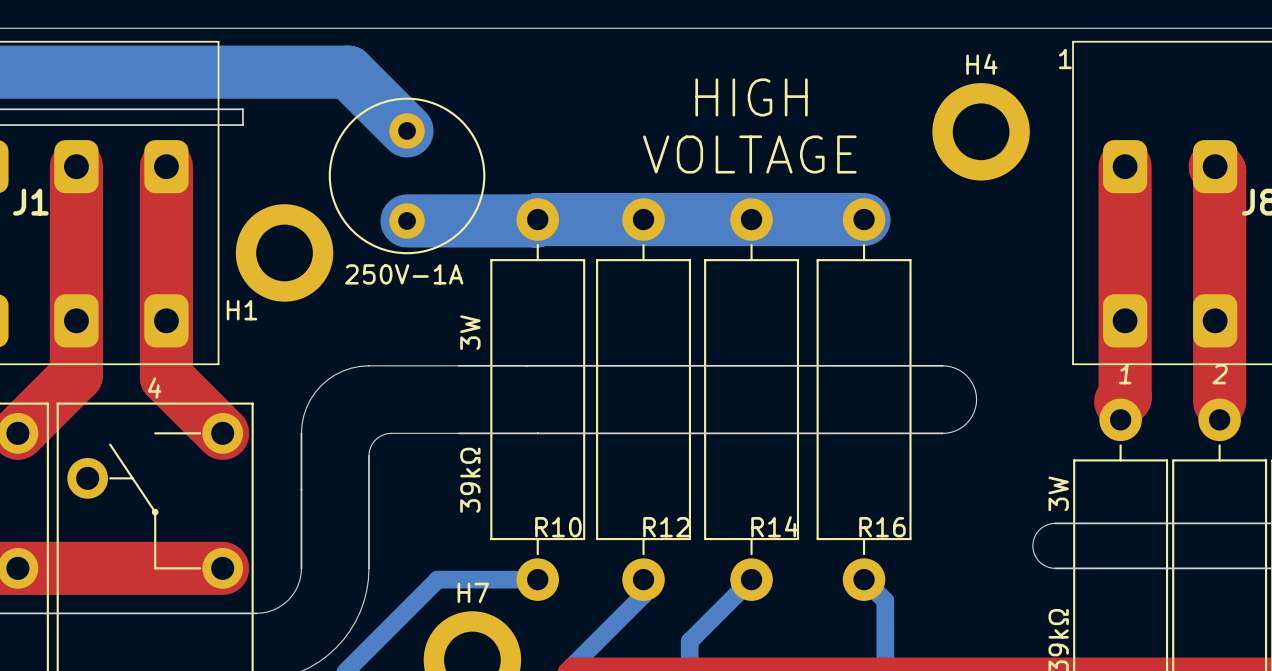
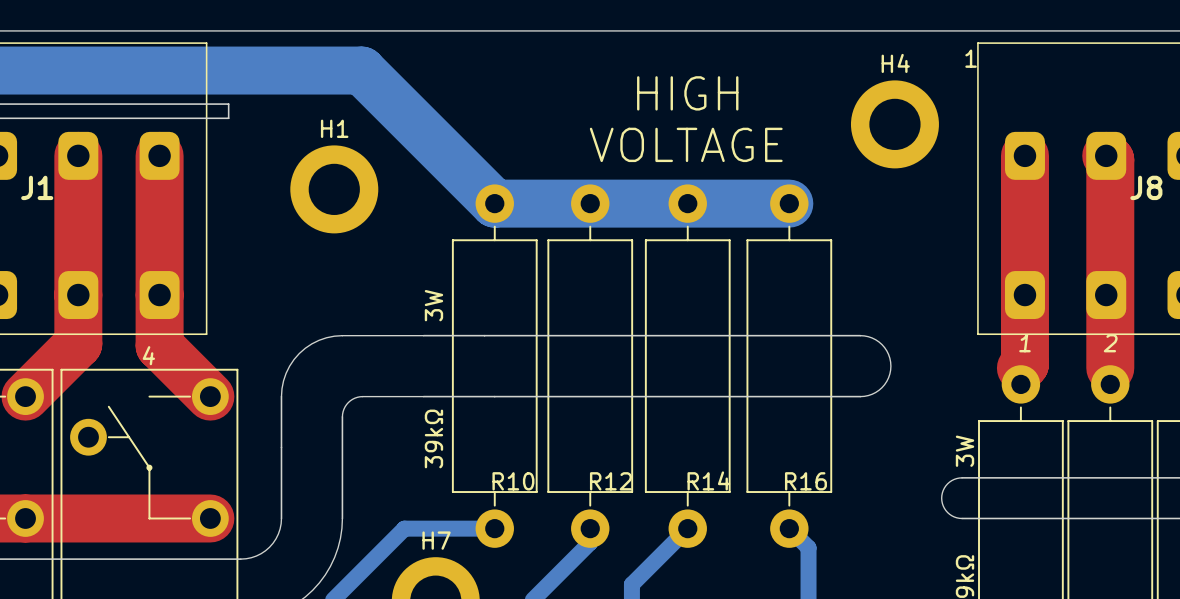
bottom track: (348, 72) (407, 130) -> (323, 70) (361, 70) (494, 203)
250V-1A: (407, 175) -> none
bottom track: (537, 219) (407, 220) -> none
H1 position: (284, 252) -> (334, 189)
H1 name position: H1 (241, 310) -> H1 (334, 128)

